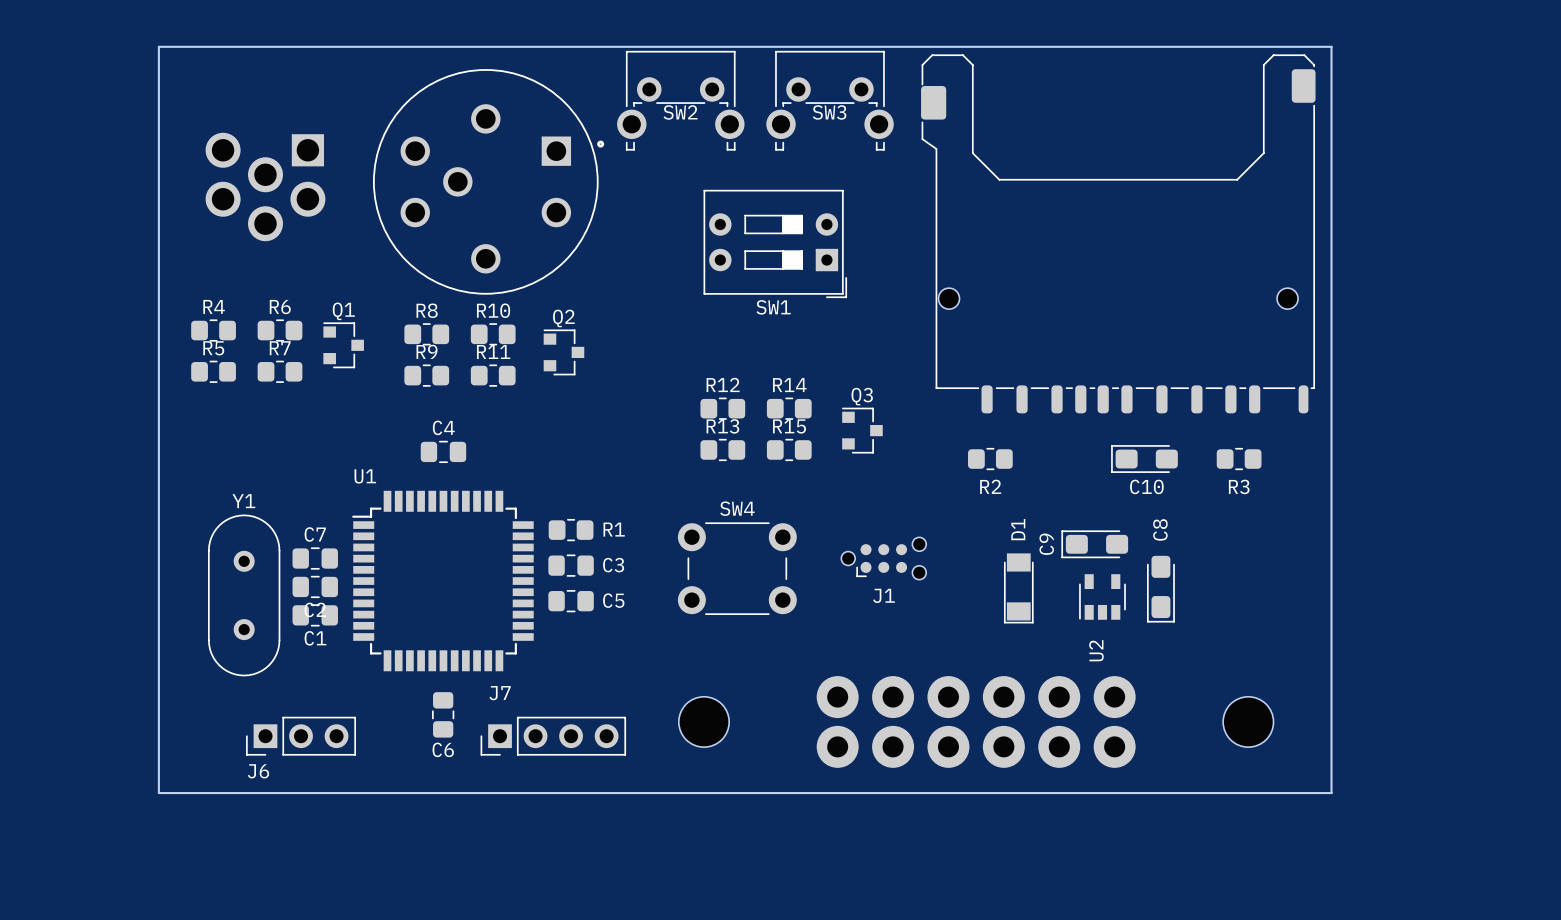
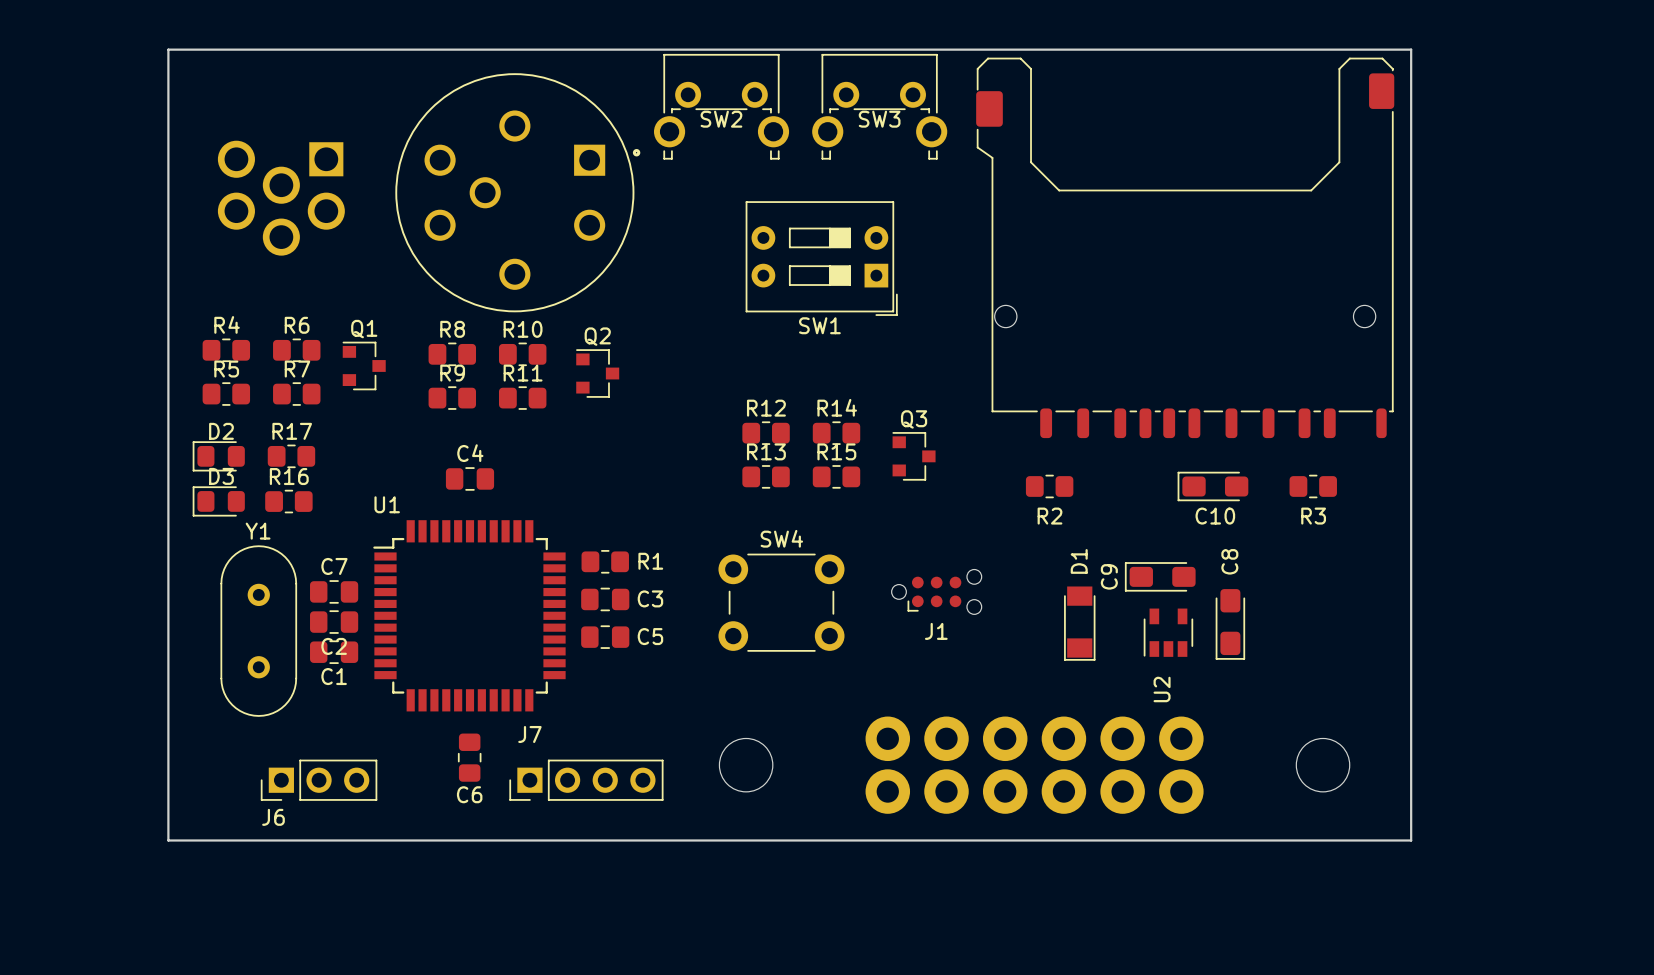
D2: none -> (218, 456)
R17: none -> (291, 456)
D3: none -> (218, 501)
R16: none -> (288, 501)

